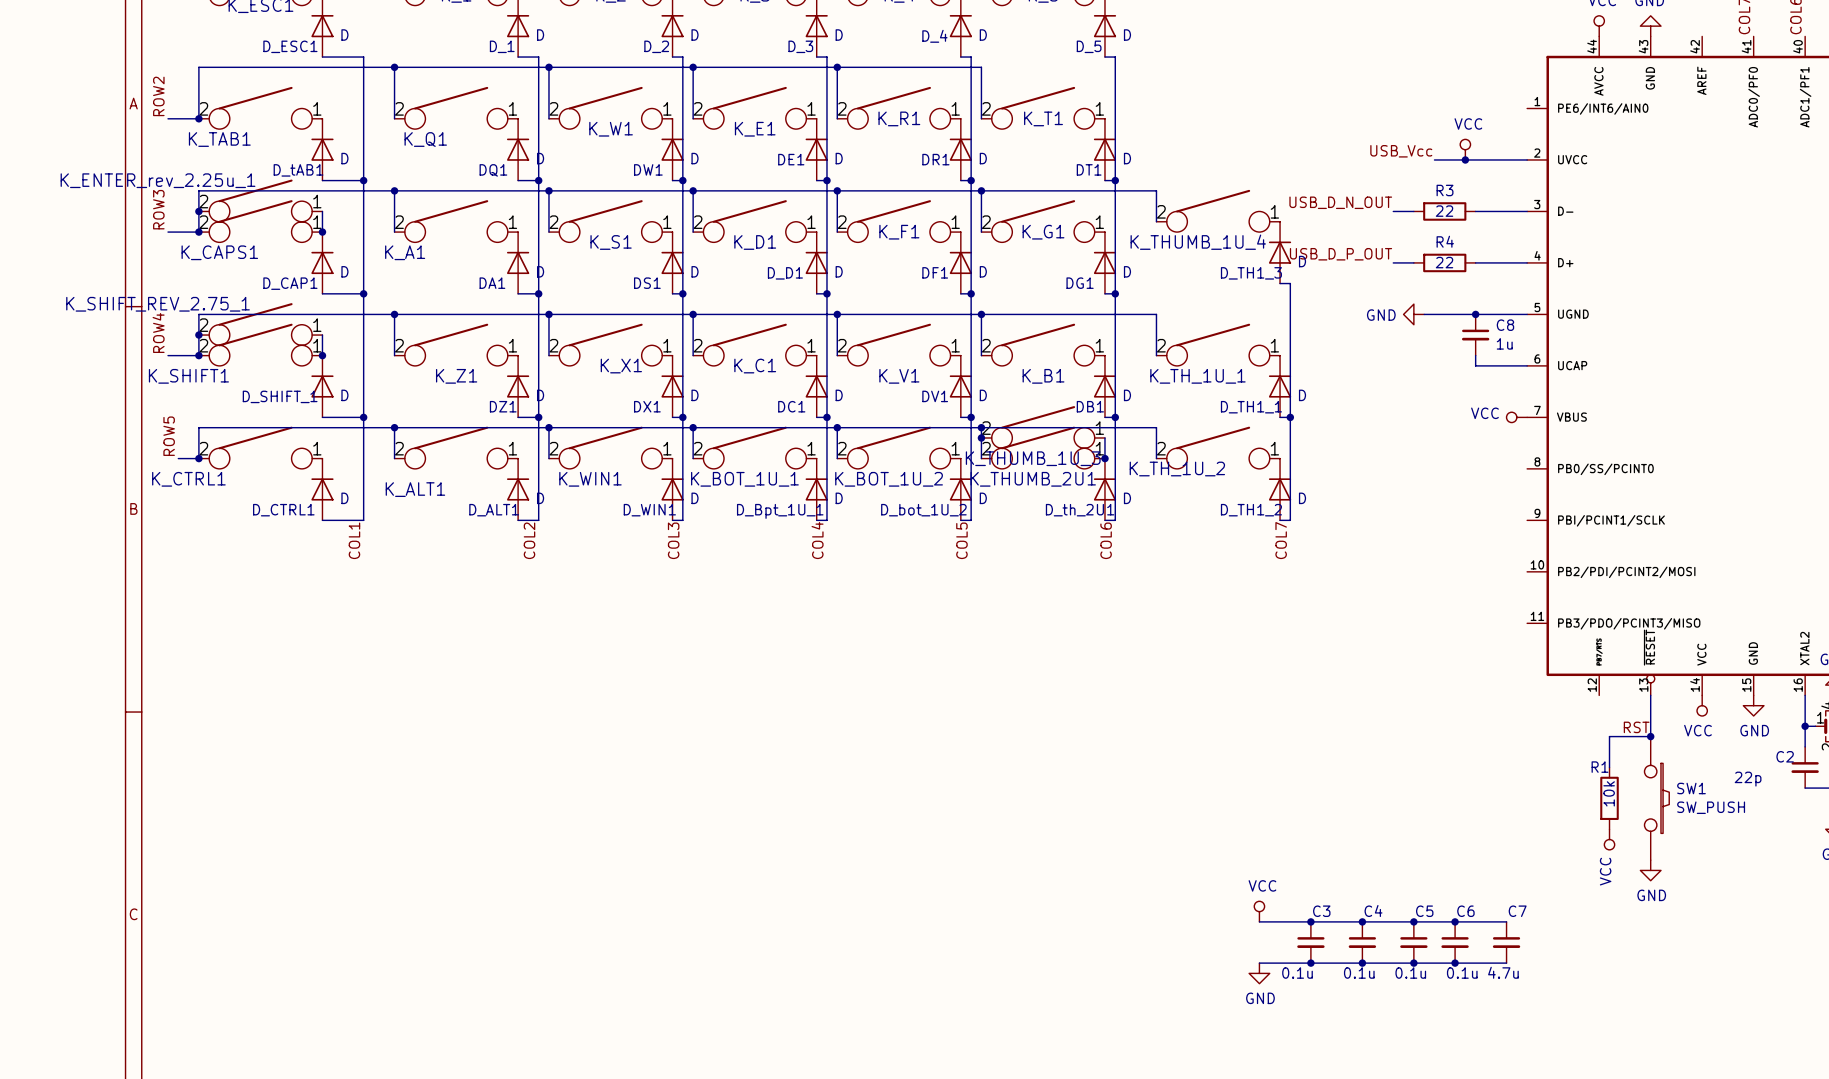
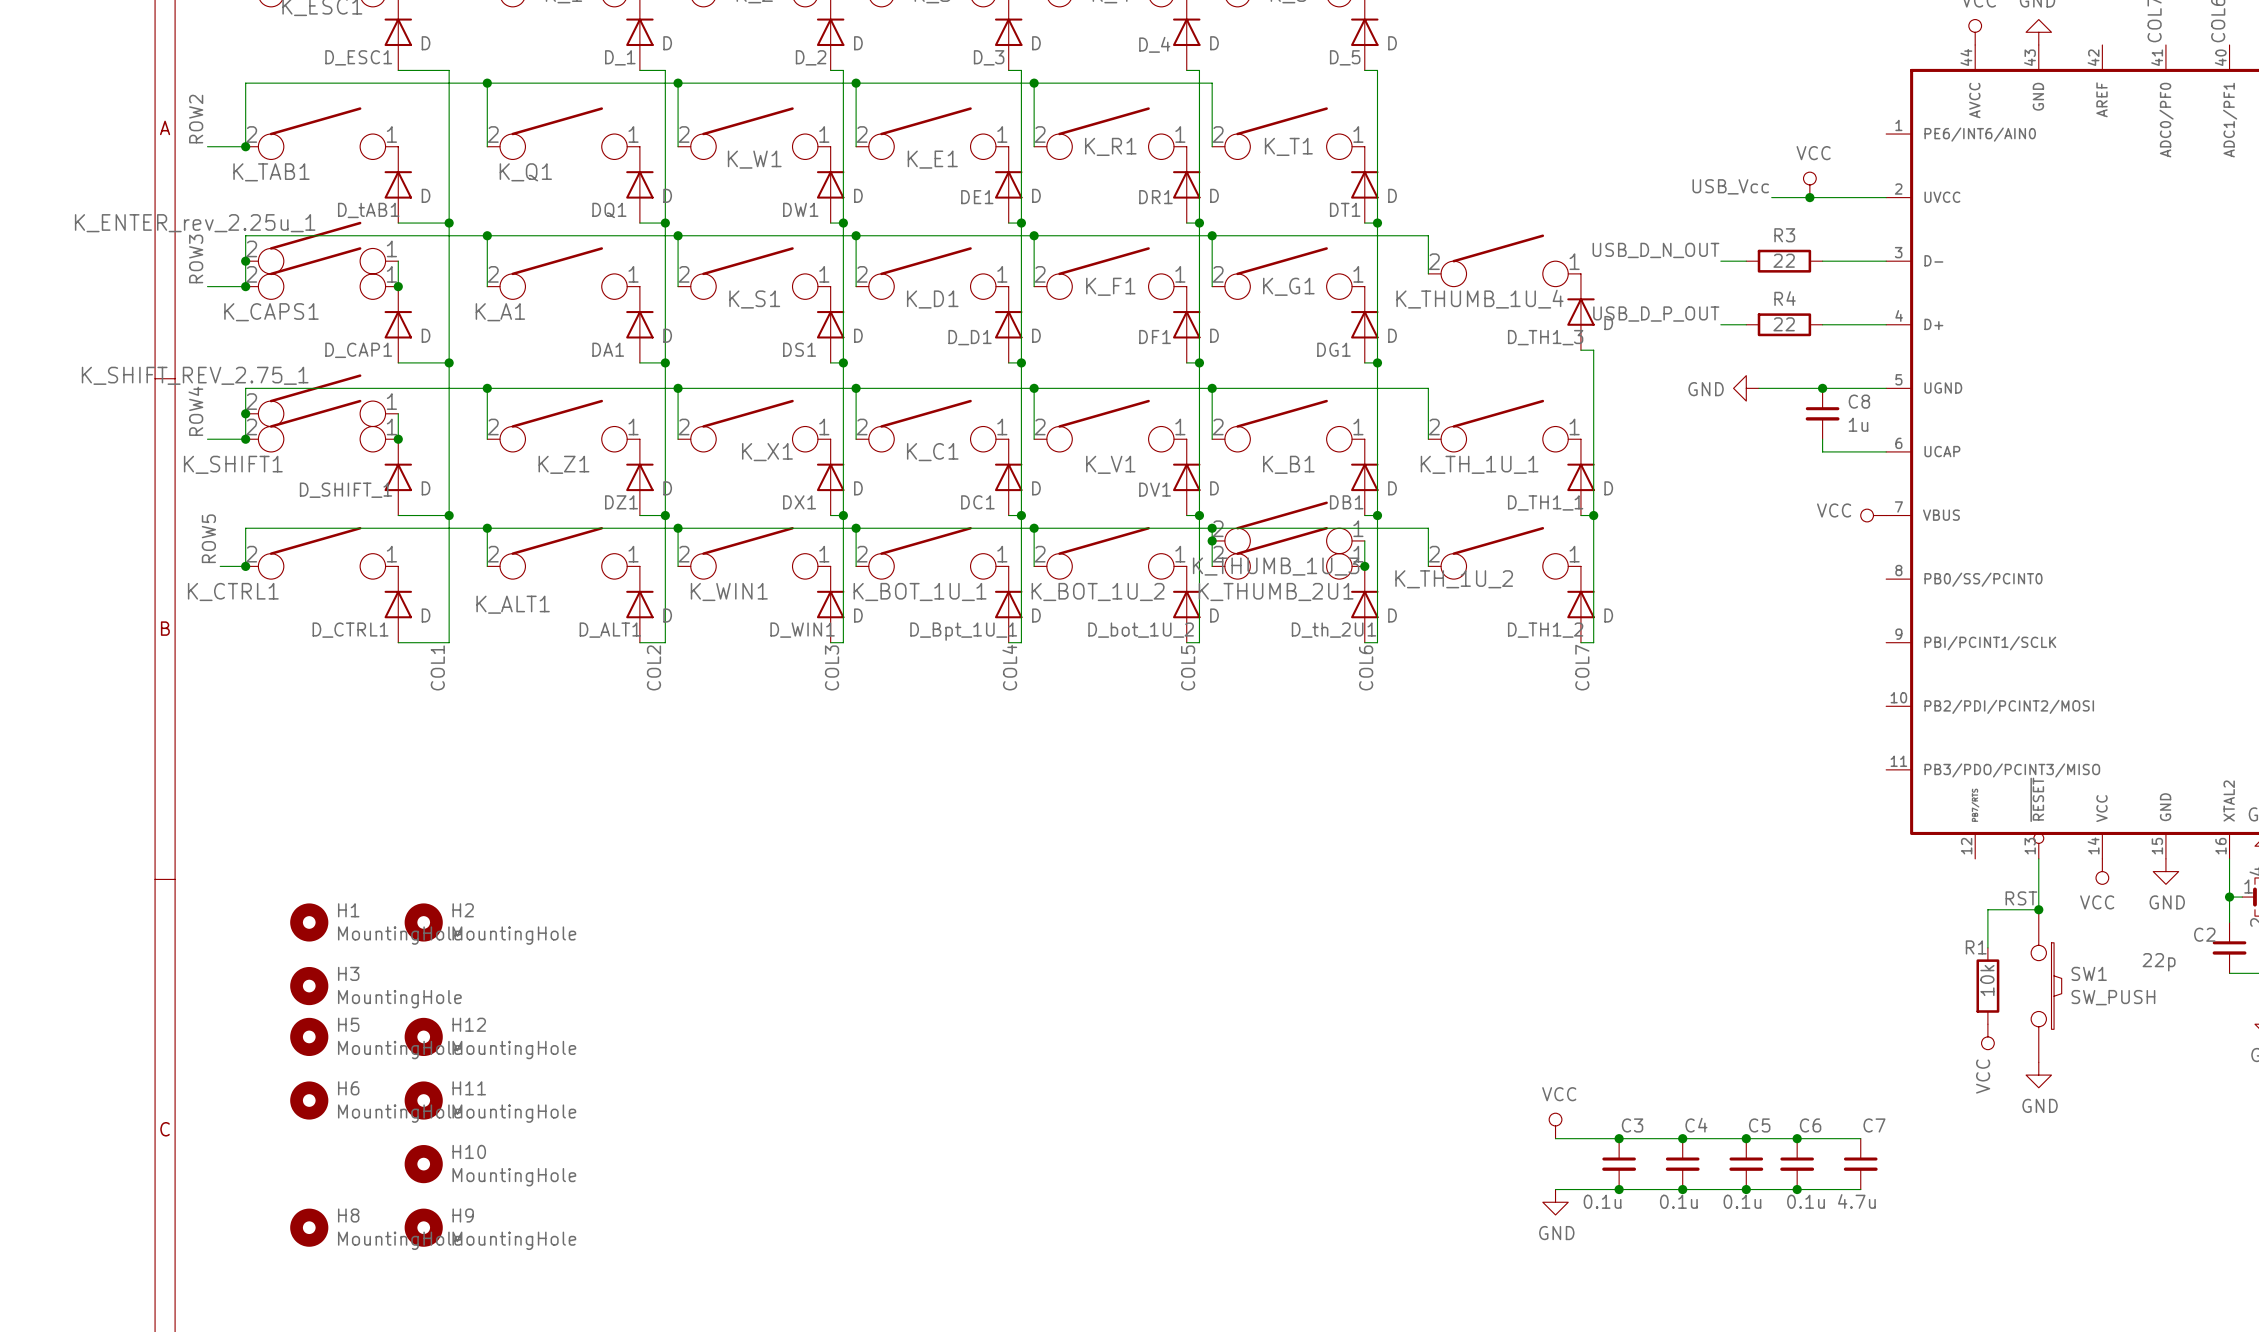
H1: none -> MountingHole (309, 922)
H2: none -> MountingHole (423, 922)
H3: none -> MountingHole (309, 986)
H5: none -> MountingHole (309, 1036)
H12: none -> MountingHole (423, 1036)
H6: none -> MountingHole (309, 1100)
H11: none -> MountingHole (423, 1100)
H10: none -> MountingHole (423, 1164)
H8: none -> MountingHole (309, 1227)
H9: none -> MountingHole (423, 1227)

